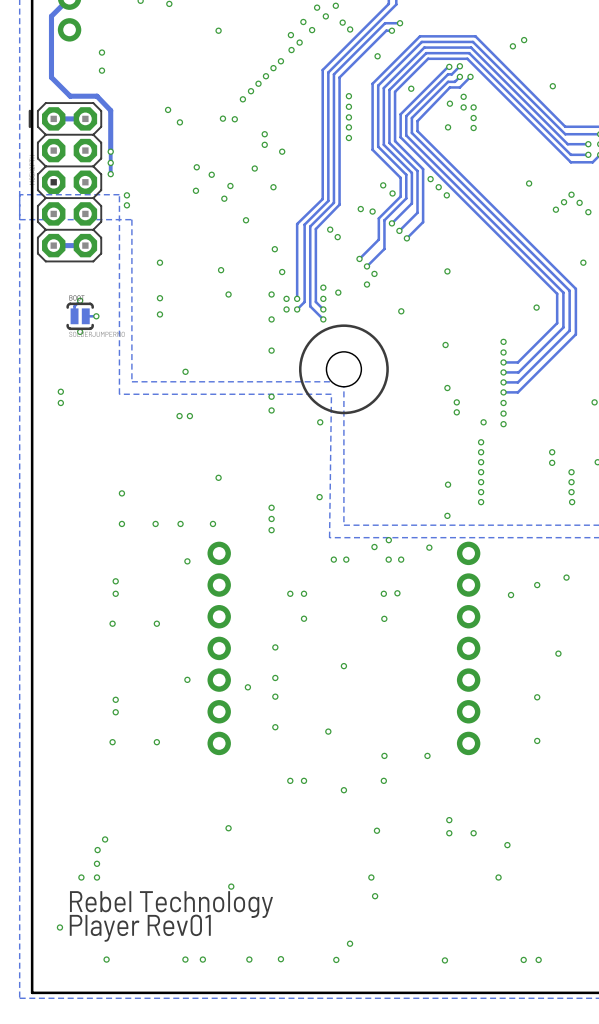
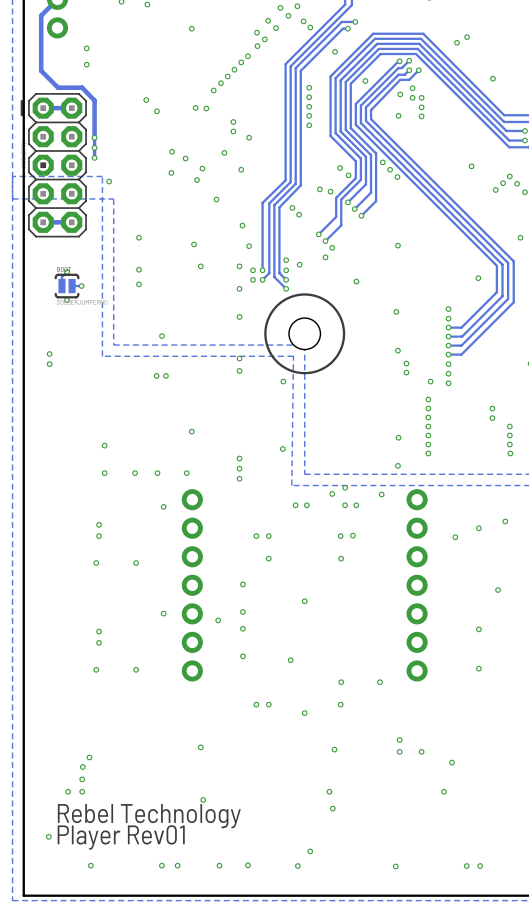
via: (126, 195) -> none
via: none -> (109, 181)
via: (126, 205) -> none

